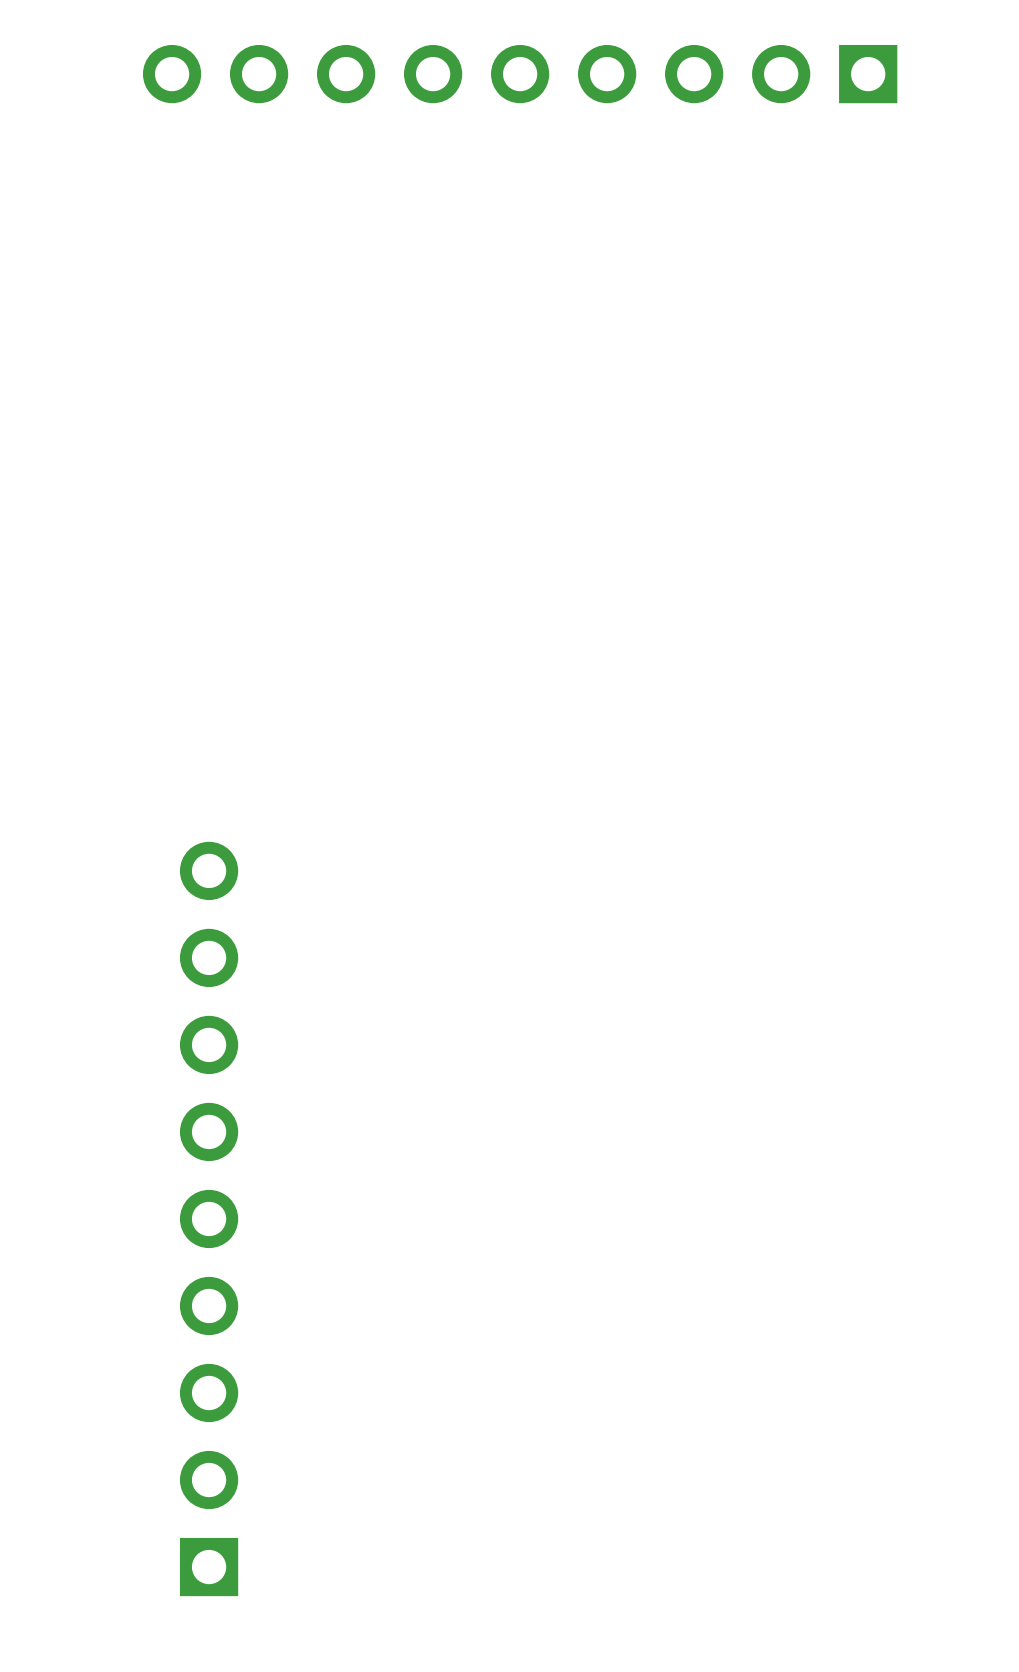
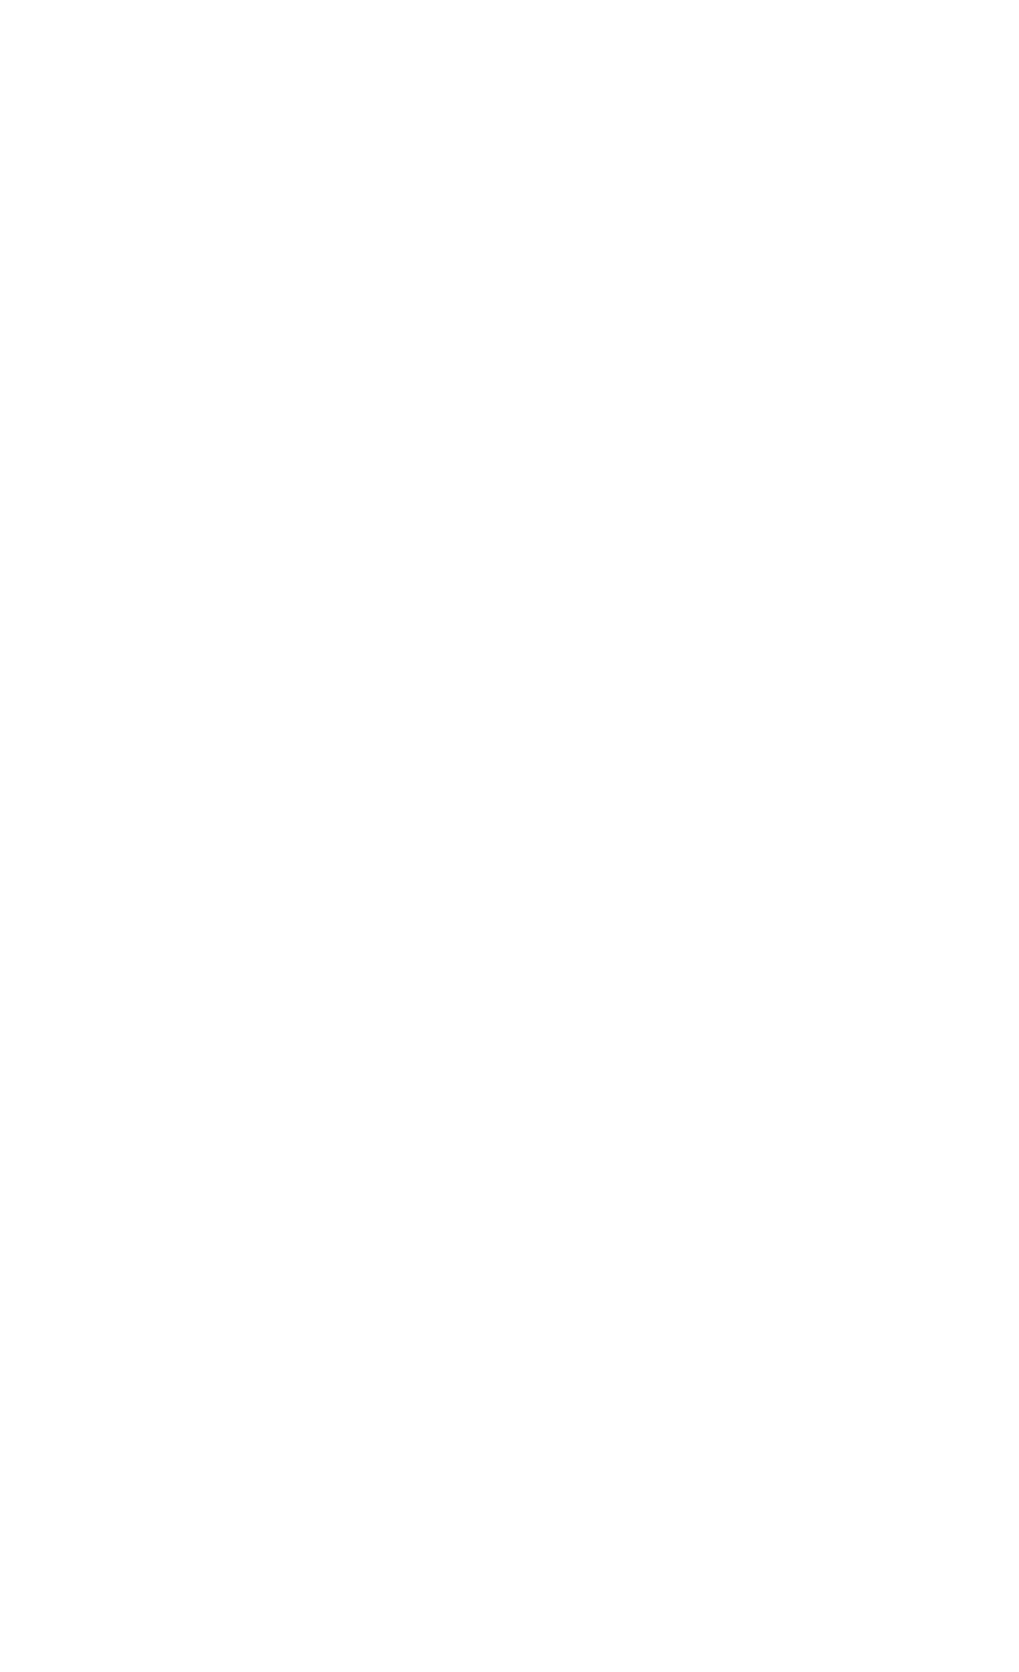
part: (520, 74) -> none
part: (209, 1218) -> none

